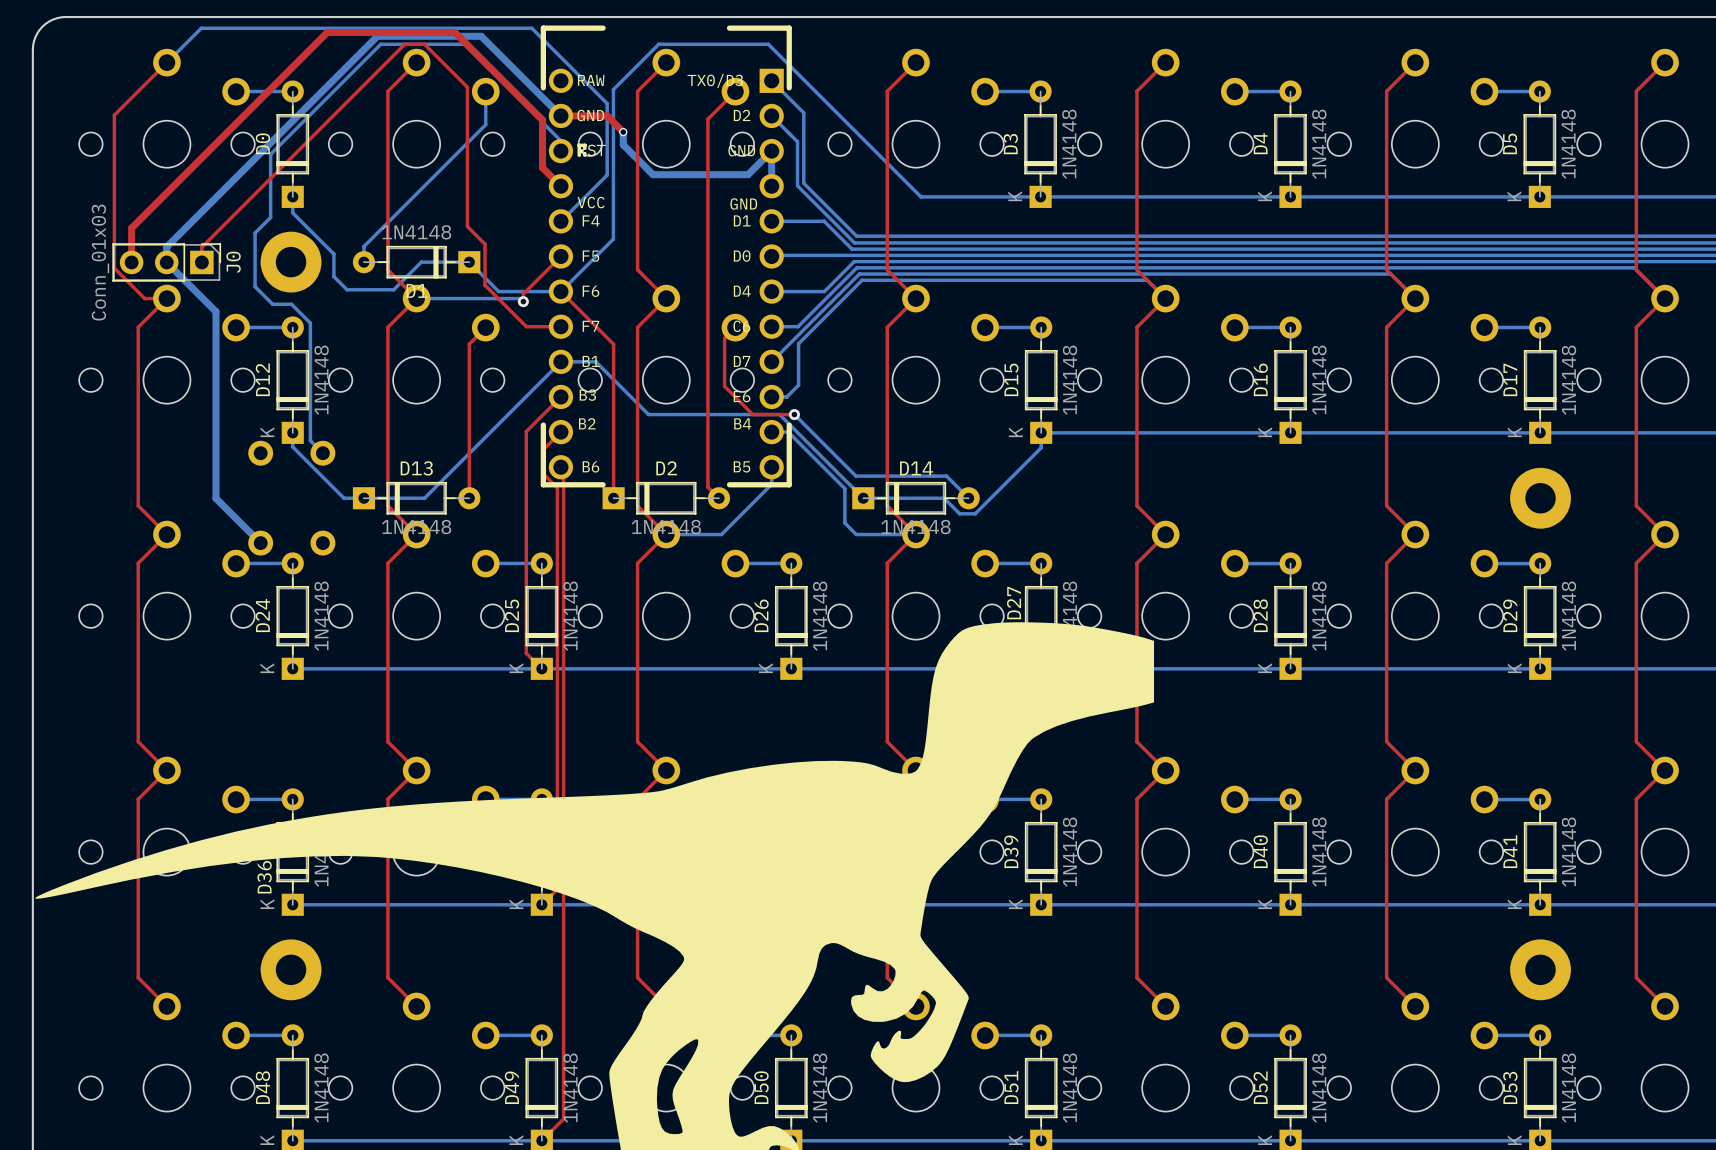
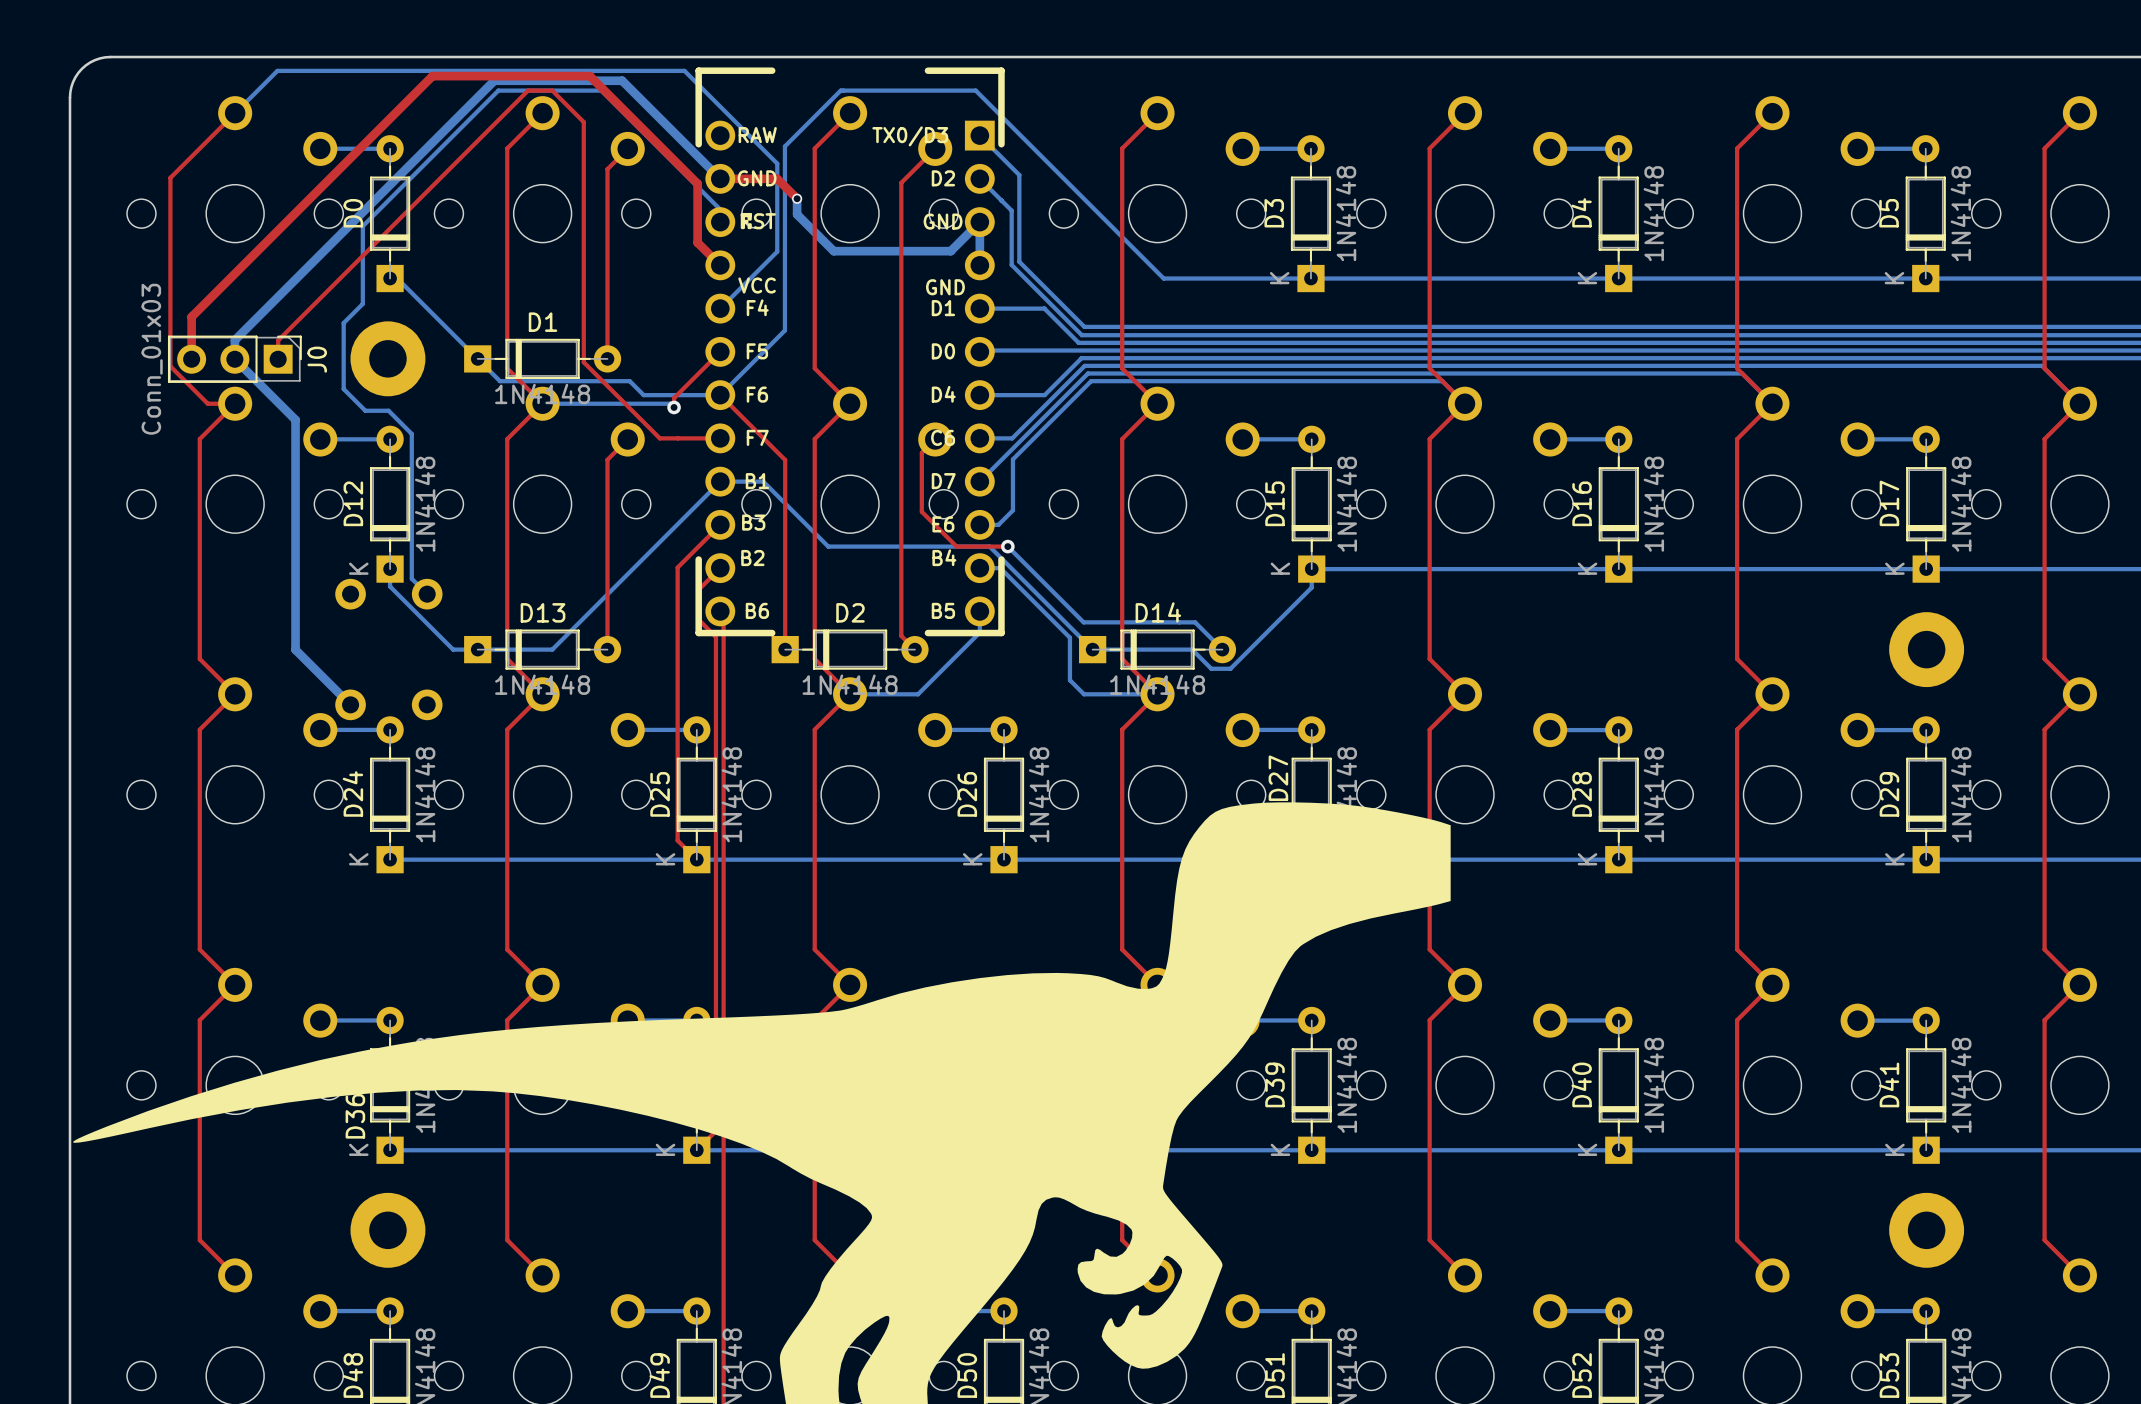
top track: (450, 69) (467, 87) (467, 226) (485, 244) (485, 285) (526, 326) -> (583, 122) (583, 362) (659, 438) (677, 438)
top track: none -> (627, 148) (607, 169) (607, 358)
bottom track: (485, 91) (485, 124) (363, 246) (363, 262) -> none
bottom track: (292, 196) (292, 212) (333, 254) (333, 276) (347, 289) (393, 289) (421, 262) (469, 262) (487, 280) -> (390, 278) (397, 278) (499, 381) (629, 381)
D1 rotation: 0° (416, 262) -> 180° (542, 358)

